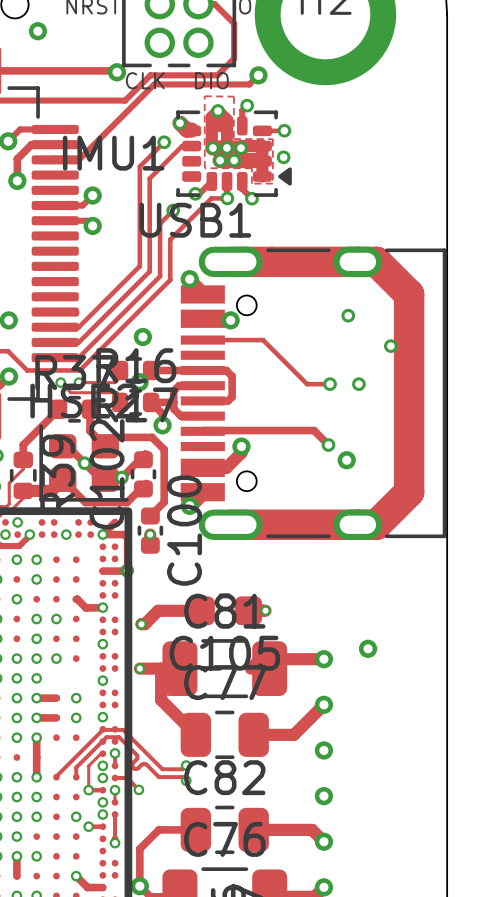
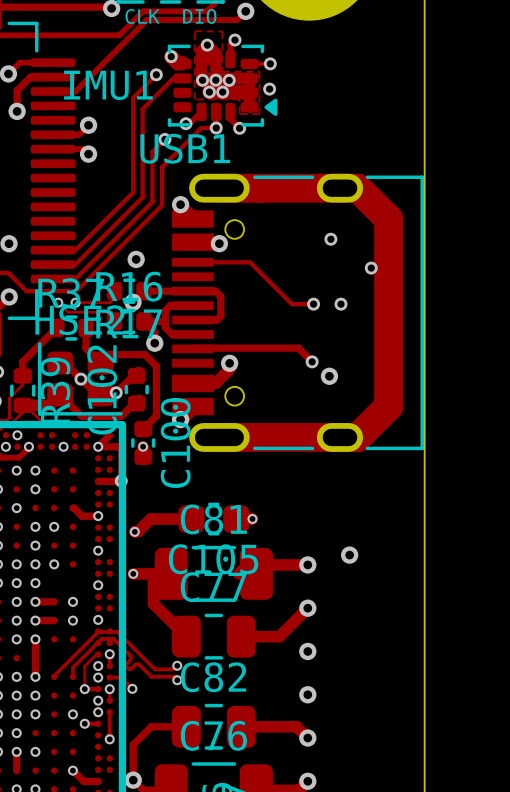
track: none -> (25, 405) (46, 426)

